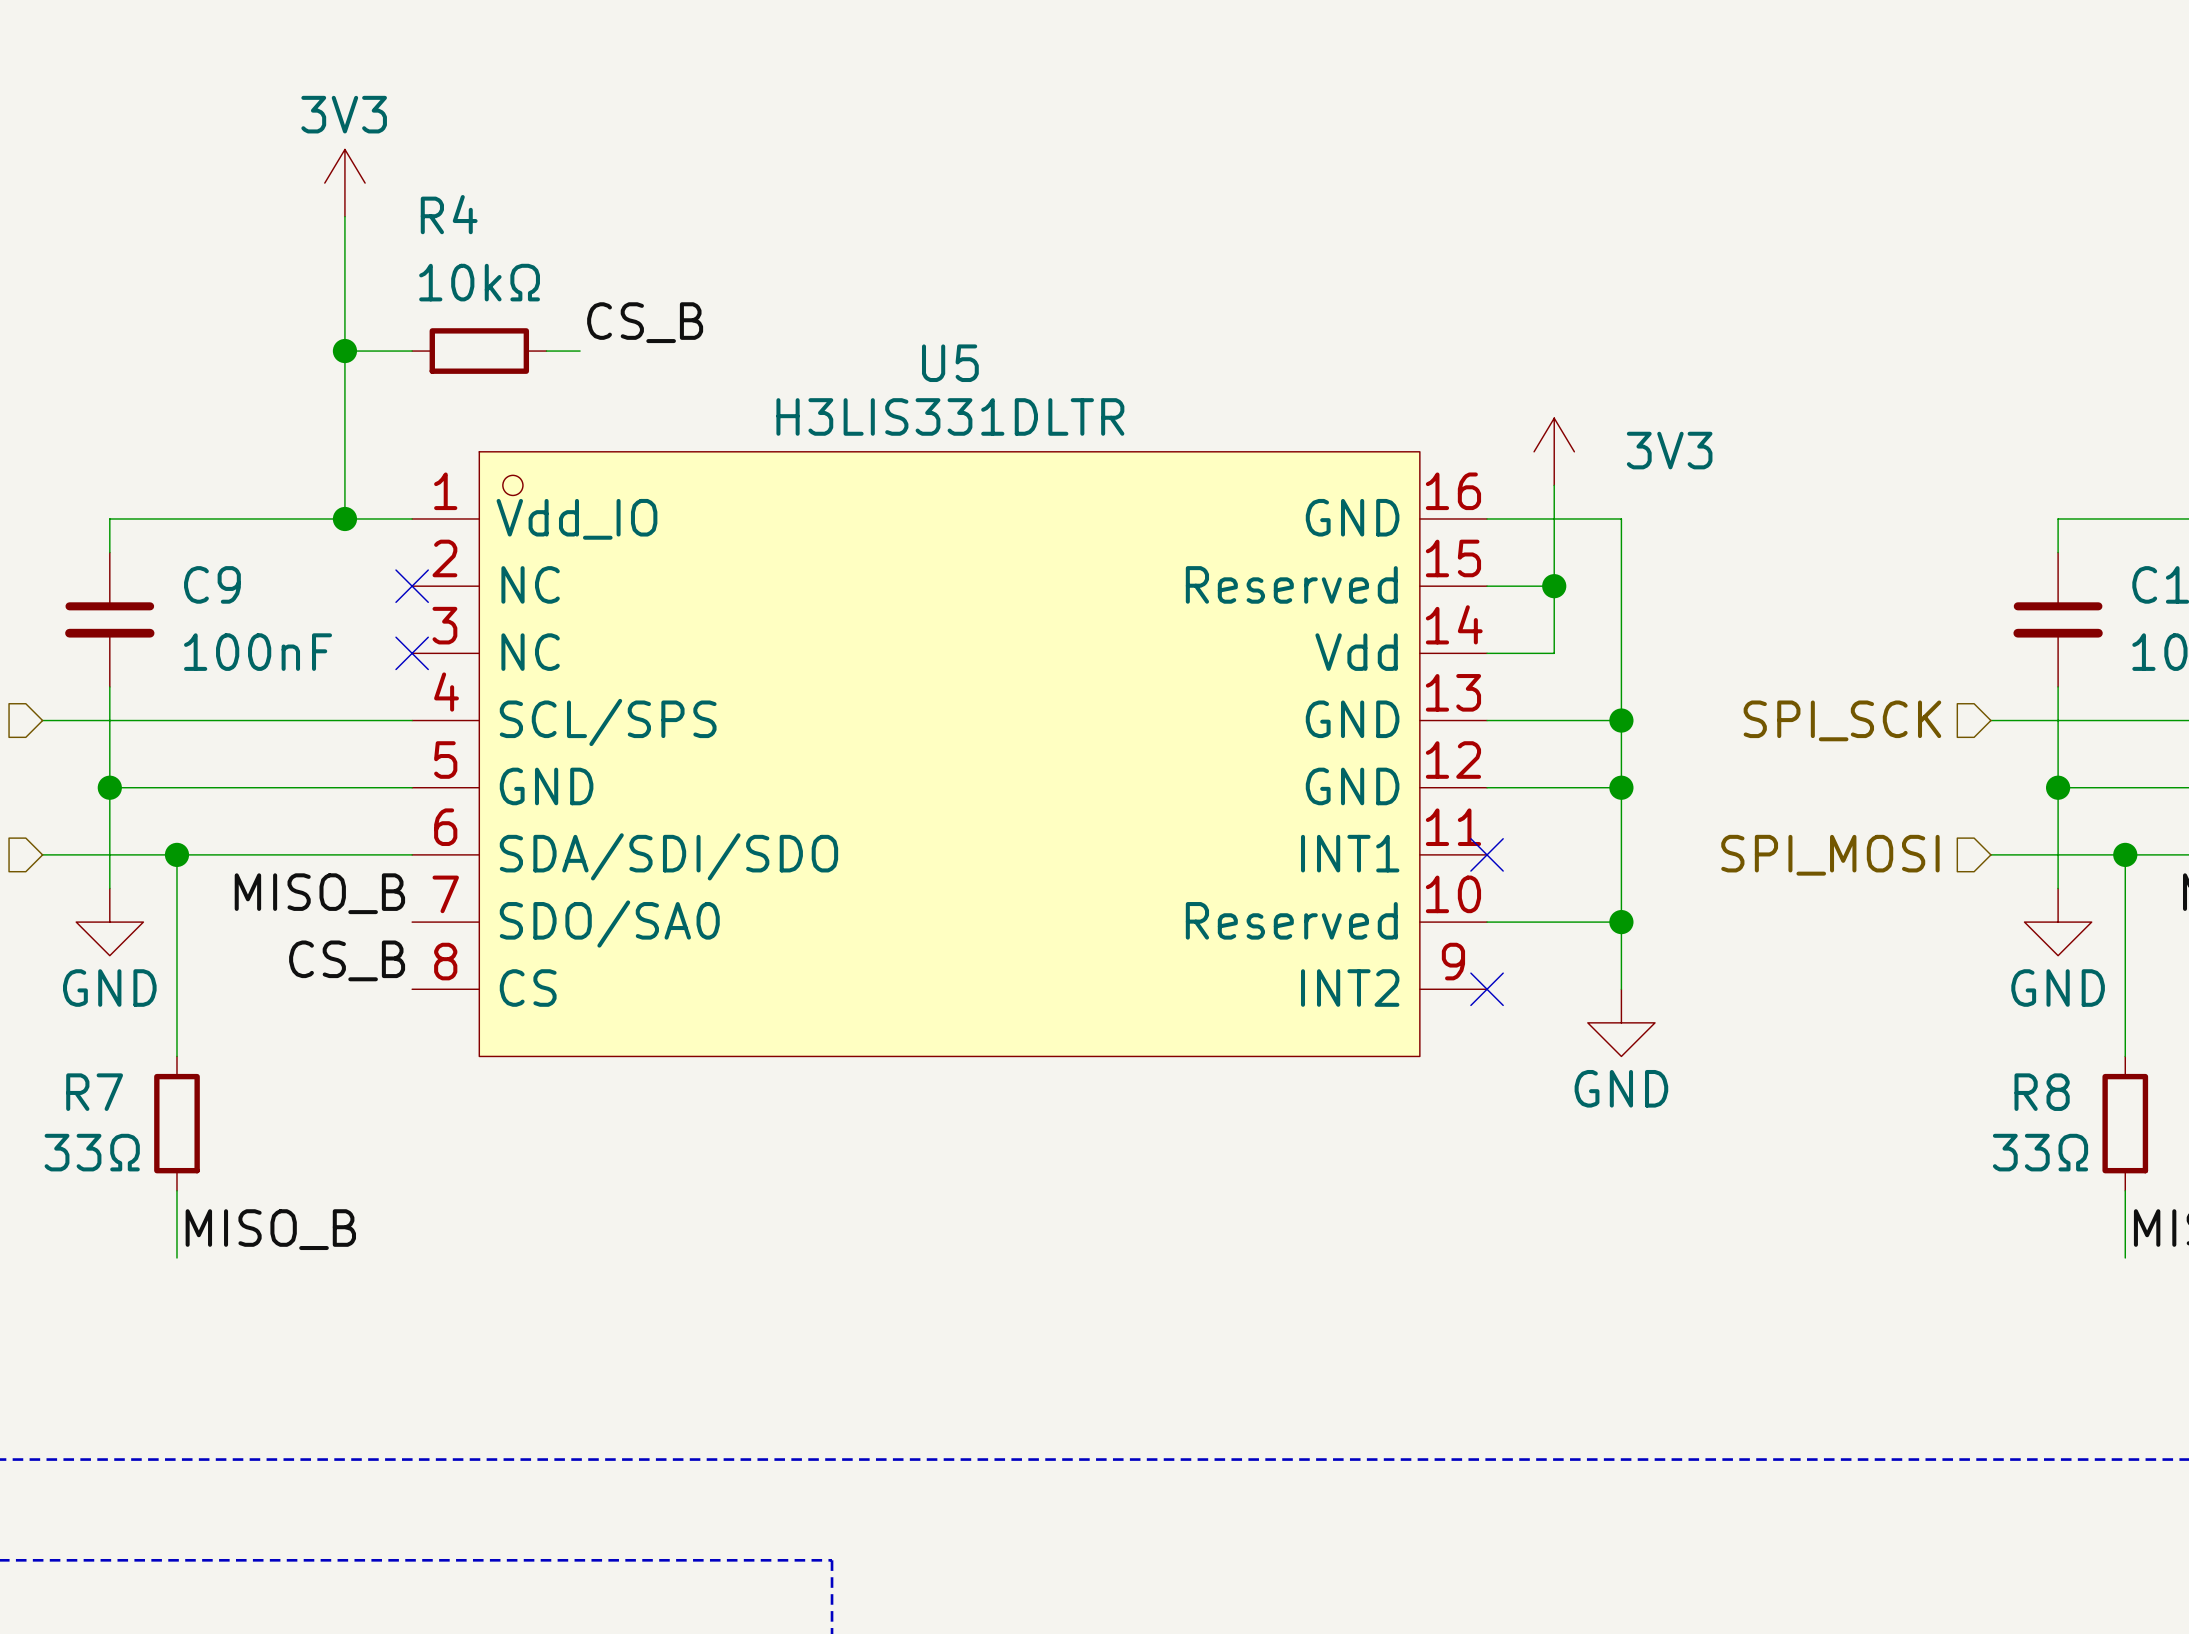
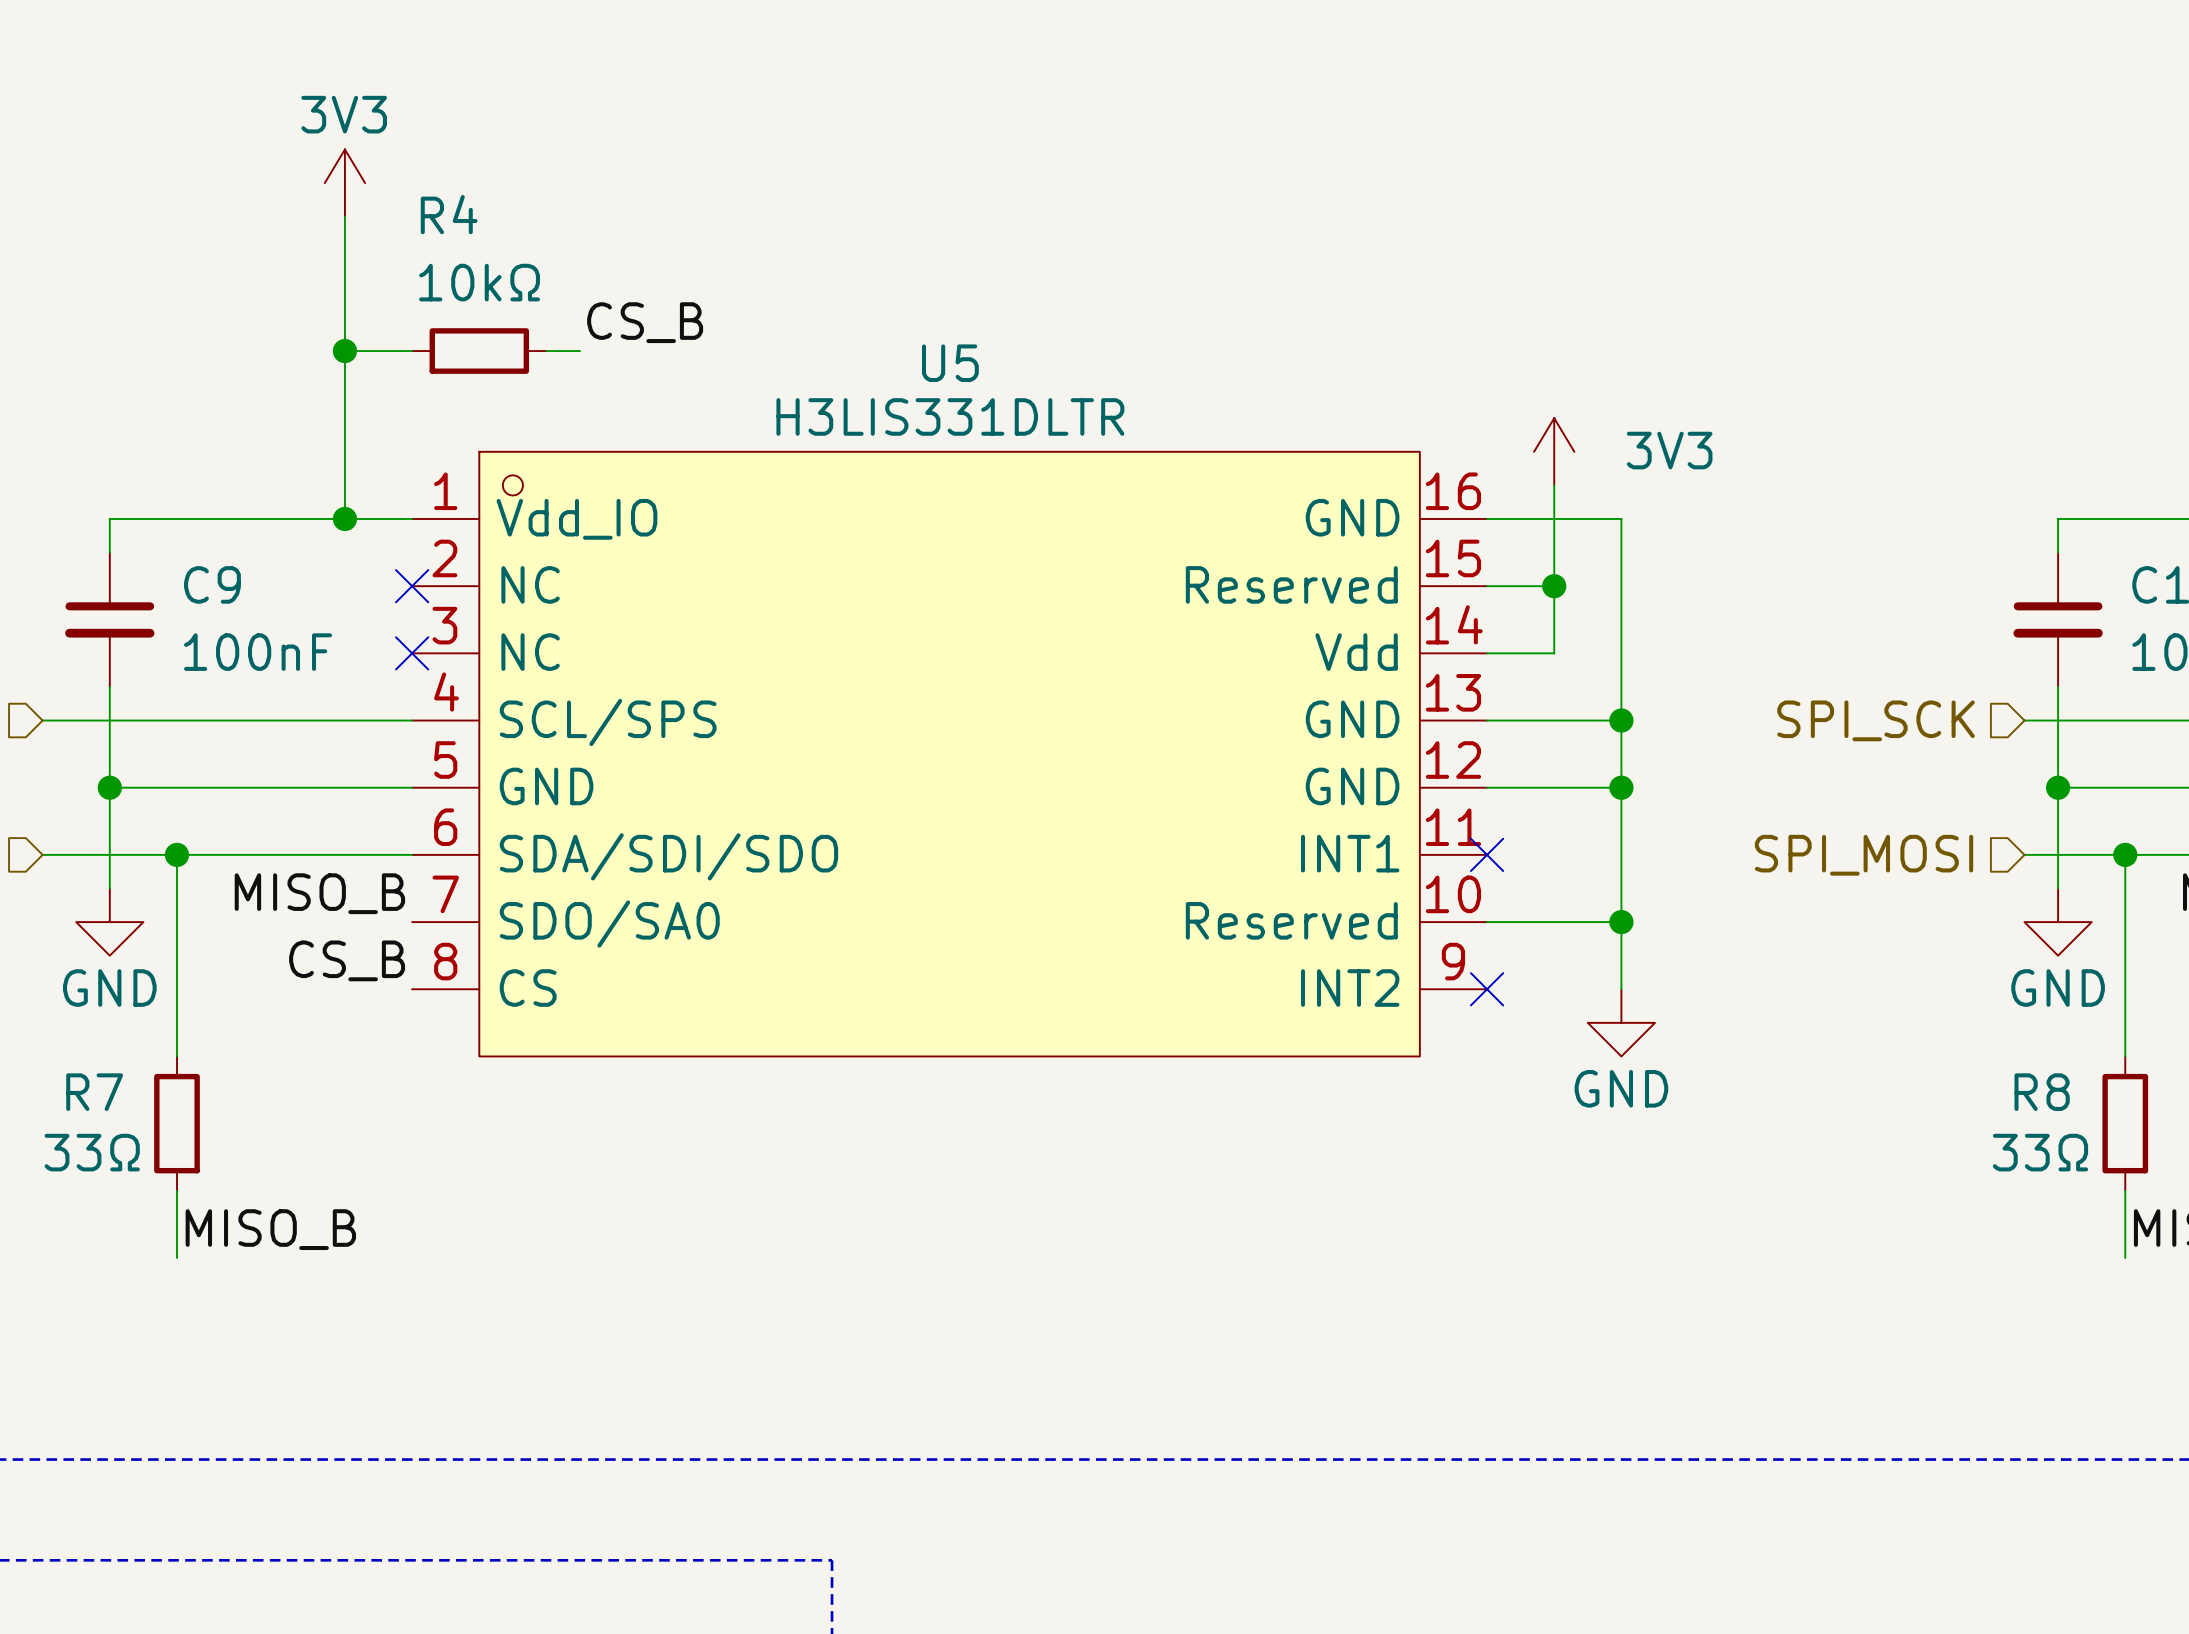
hierarchical label position: SPI_SCK (1842, 720) -> SPI_SCK (1876, 720)
wire: (1990, 720) (2024, 720) -> none
wire: (1990, 854) (2024, 854) -> none
hierarchical label position: SPI_MOSI (1830, 855) -> SPI_MOSI (1864, 855)

